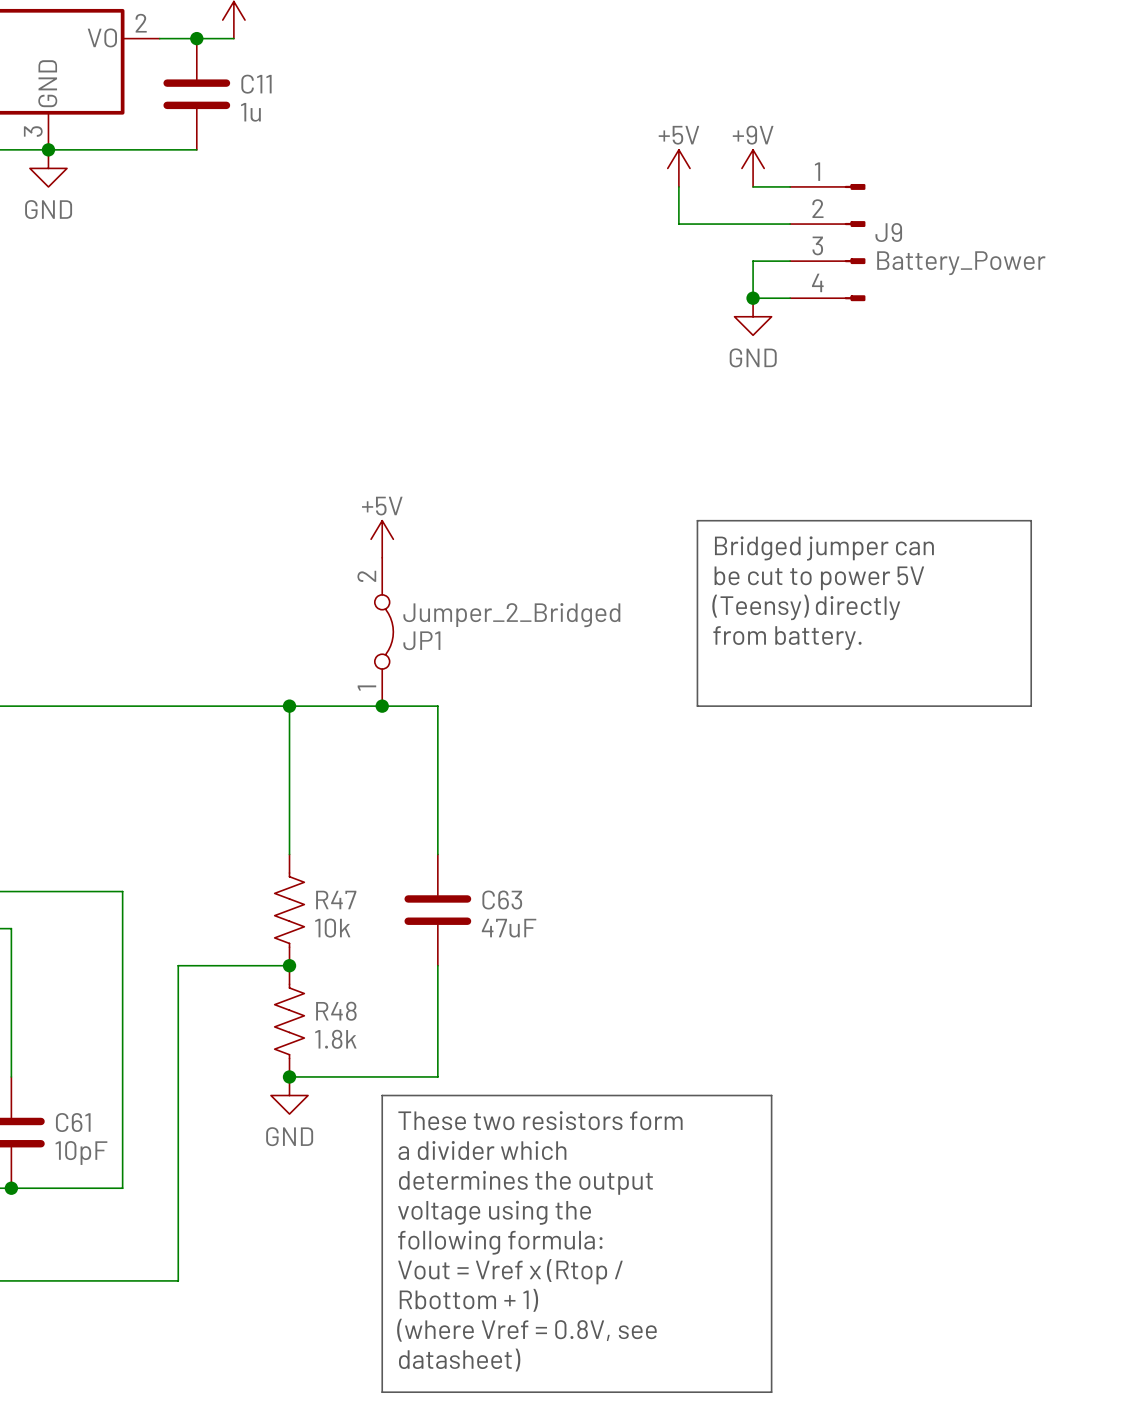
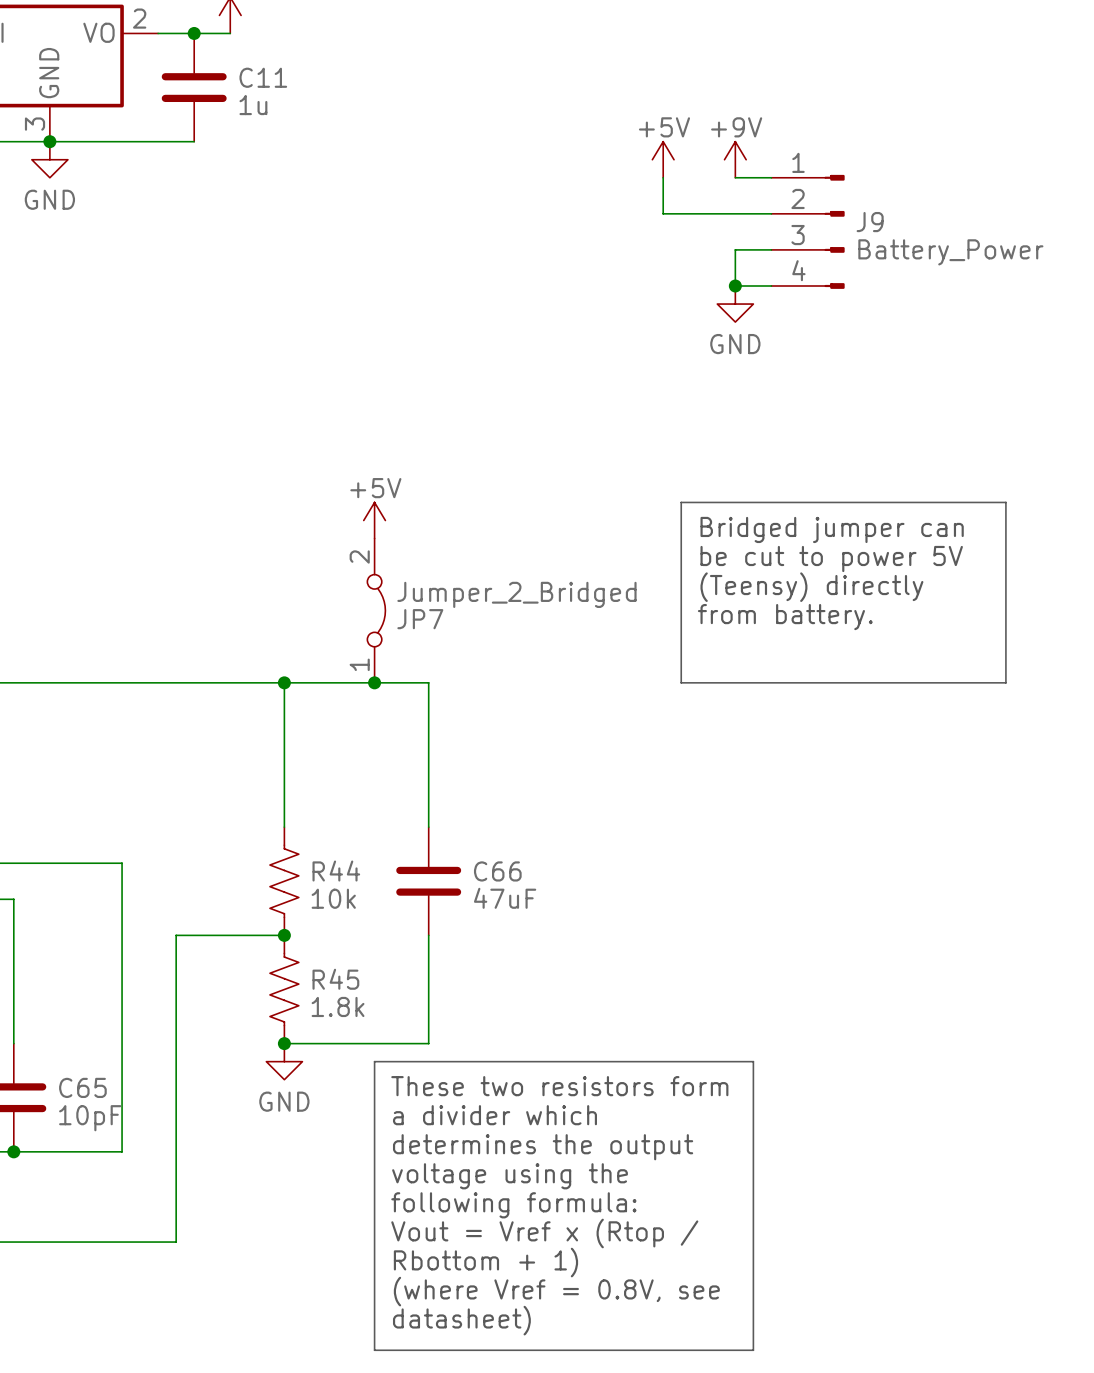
JP1 name: JP1 (421, 640) -> JP7 (420, 619)
R47 name: R47 (336, 900) -> R44 (336, 871)
C63 name: C63 (502, 900) -> C66 (497, 871)
R48 name: R48 (336, 1011) -> R45 (335, 979)
C61 name: C61 (73, 1122) -> C65 (82, 1087)

